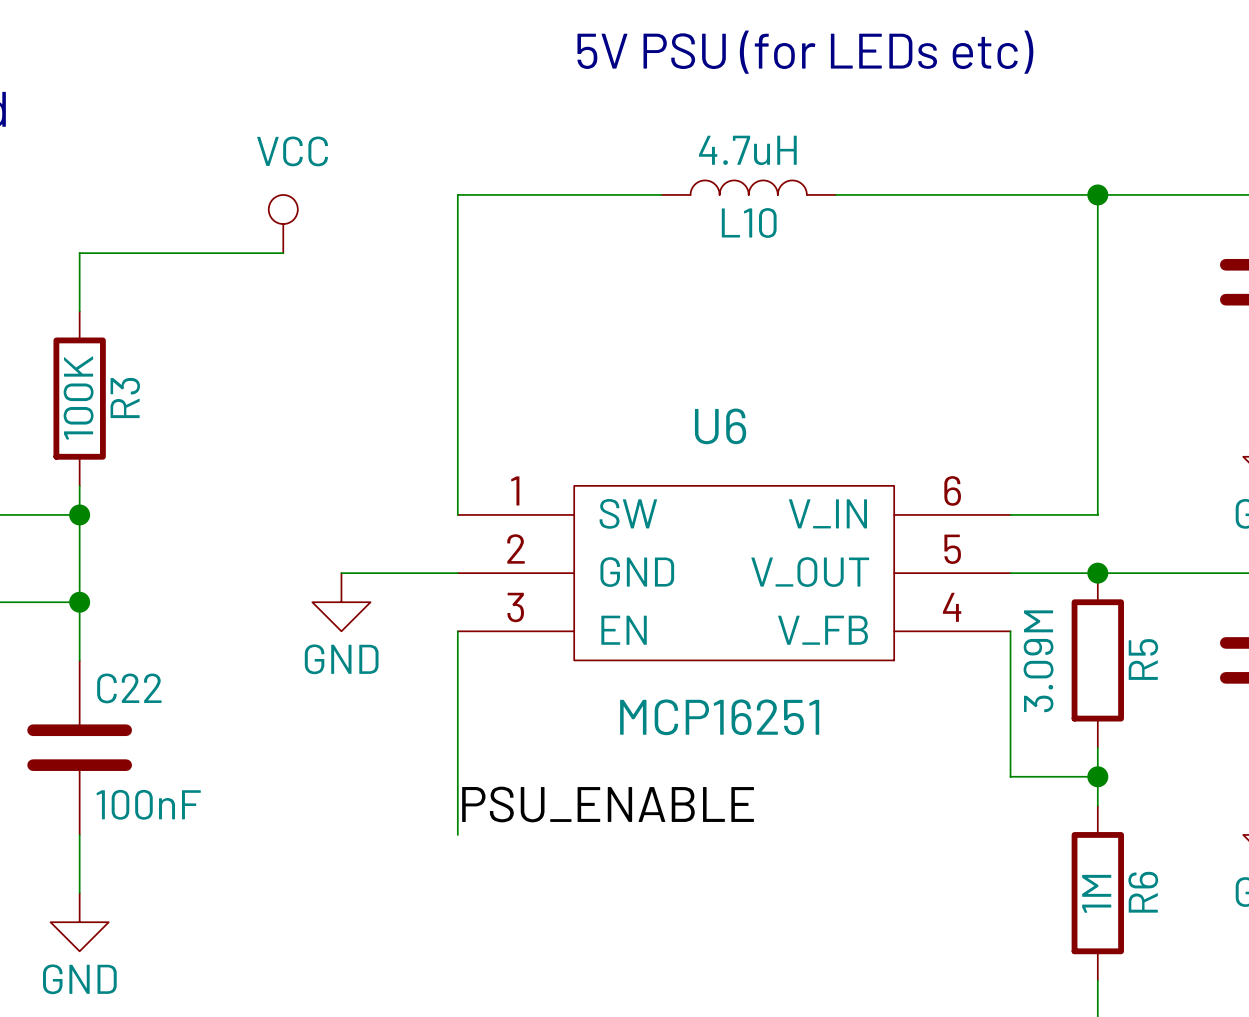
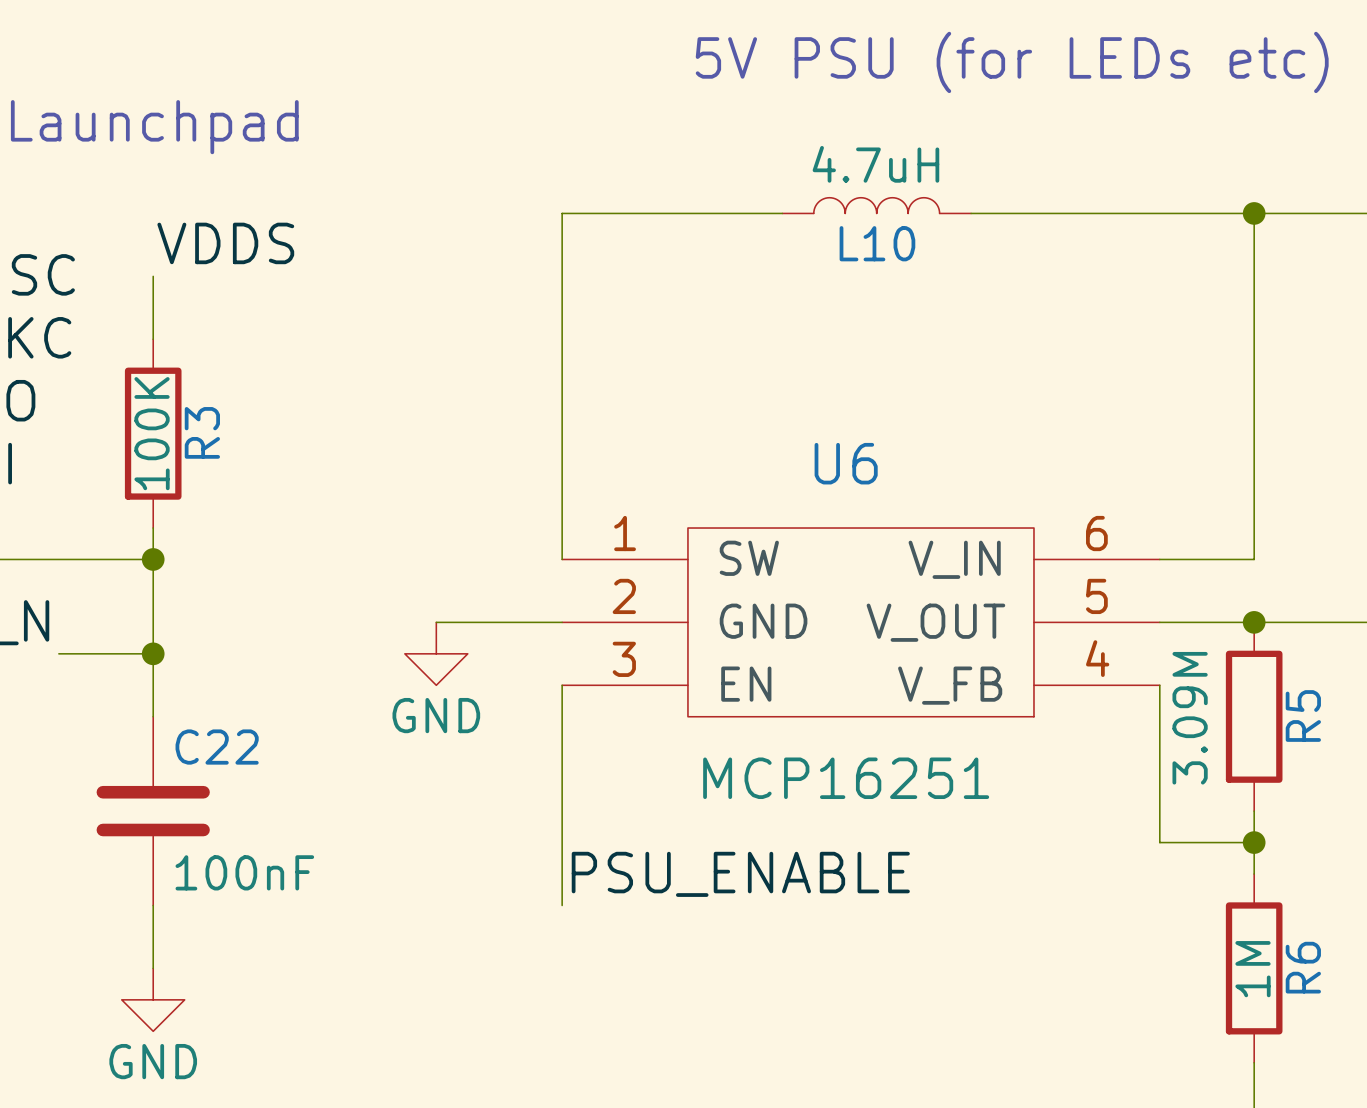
label: none -> VDDS (225, 243)
power symbol: VCC (283, 224) -> none
wire: (79, 253) (283, 253) -> none

